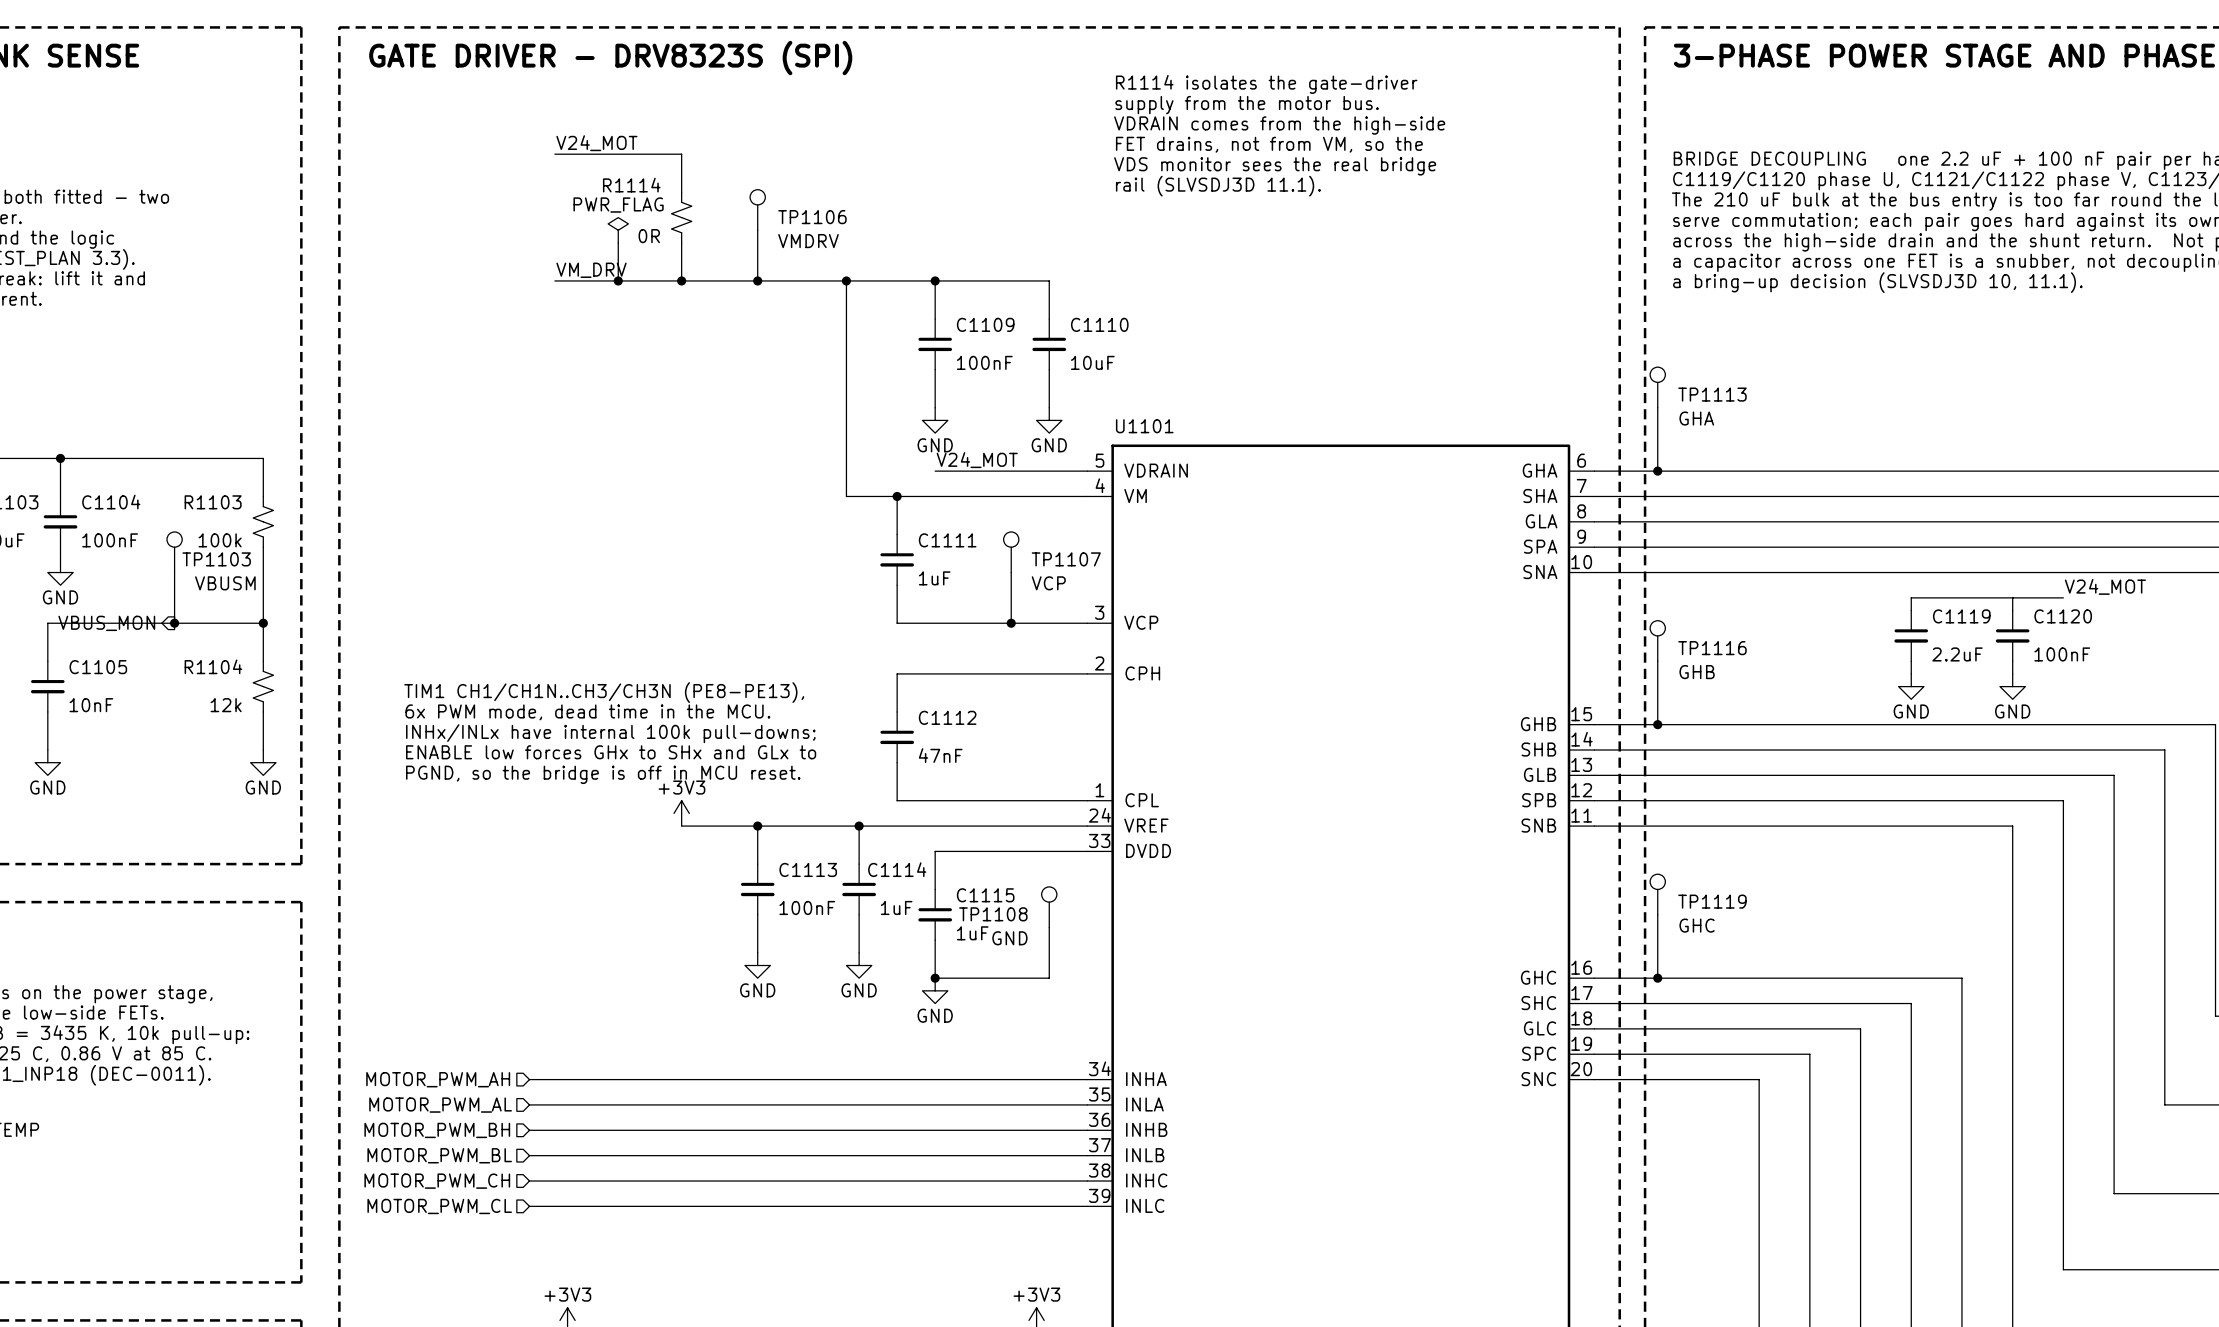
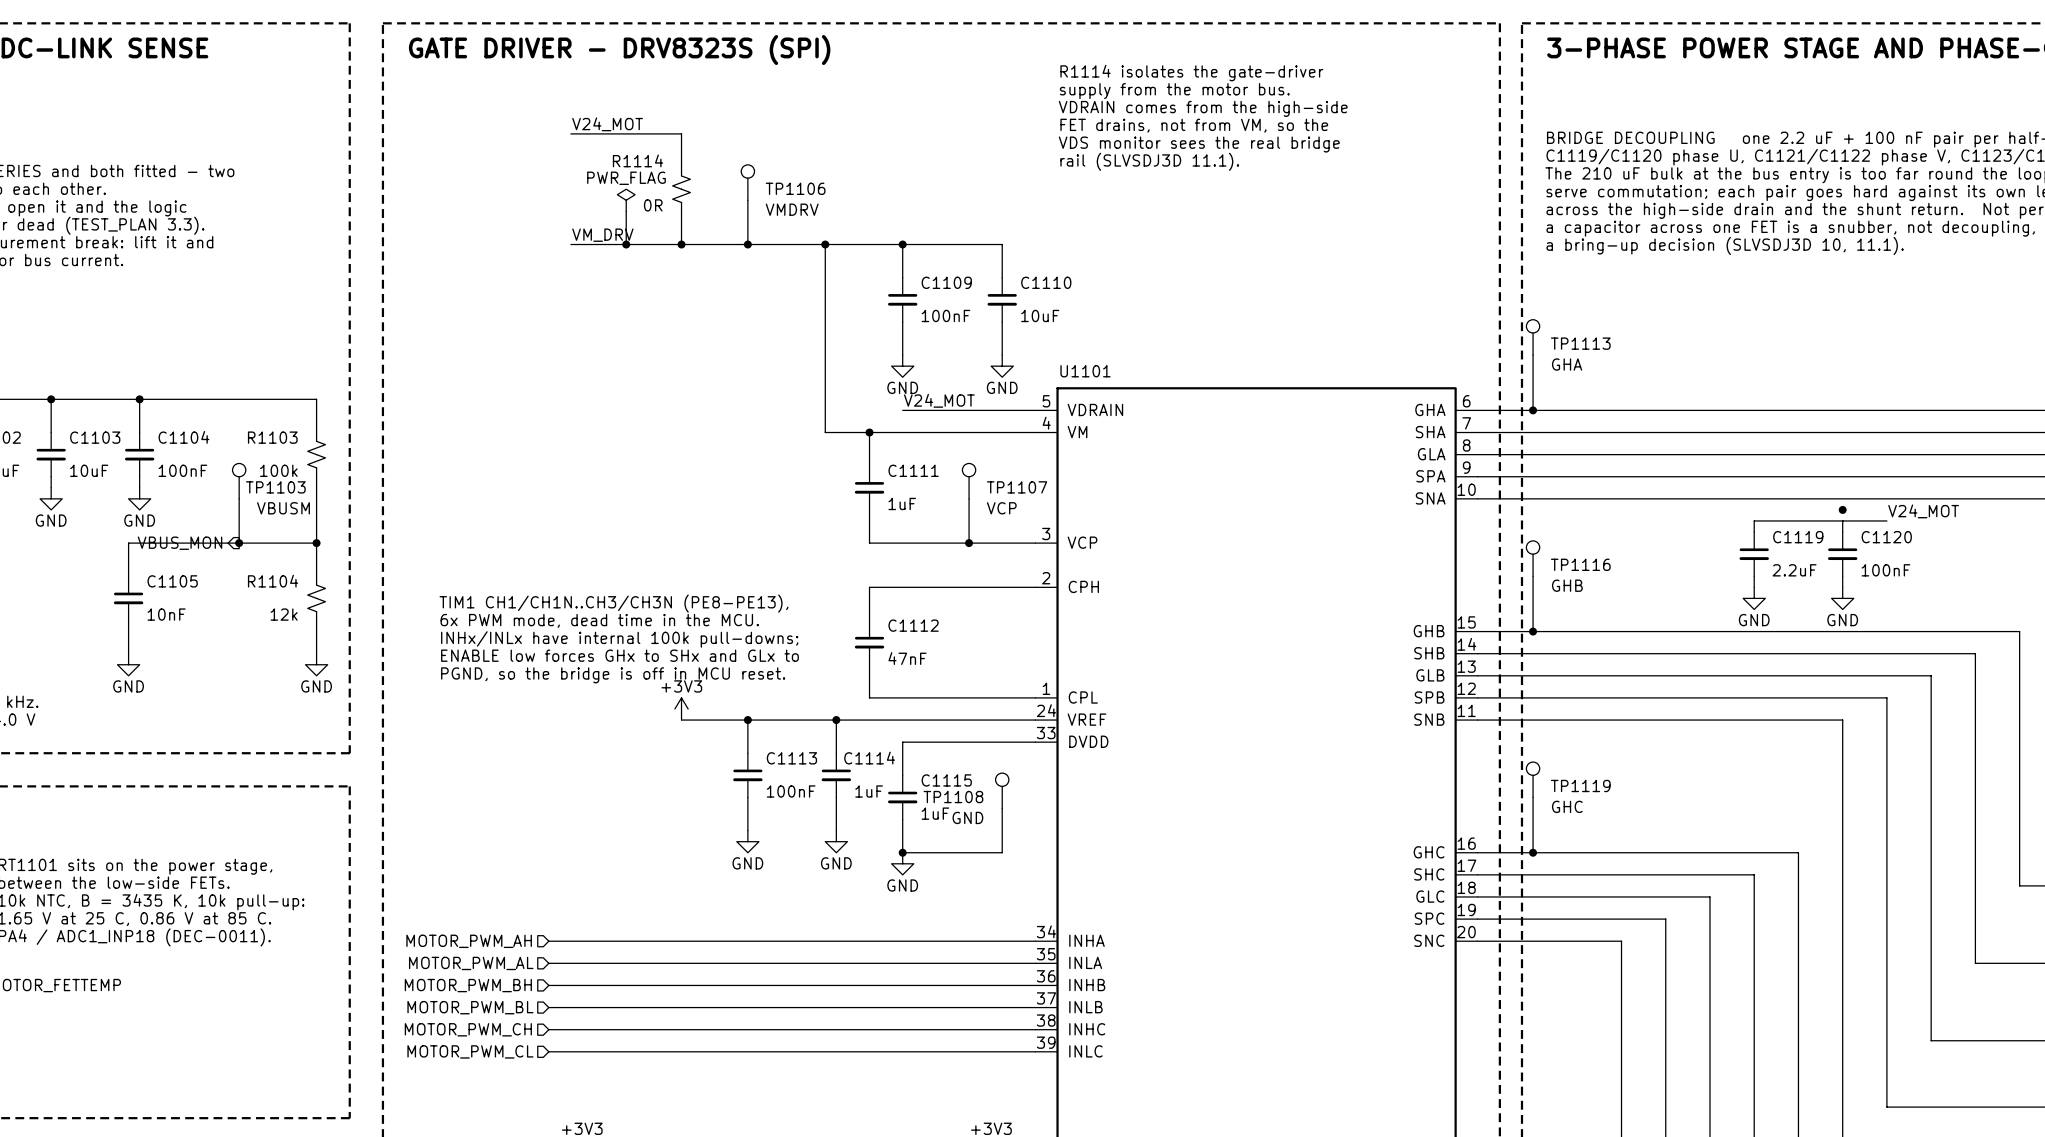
junction: none -> (1842, 509)

